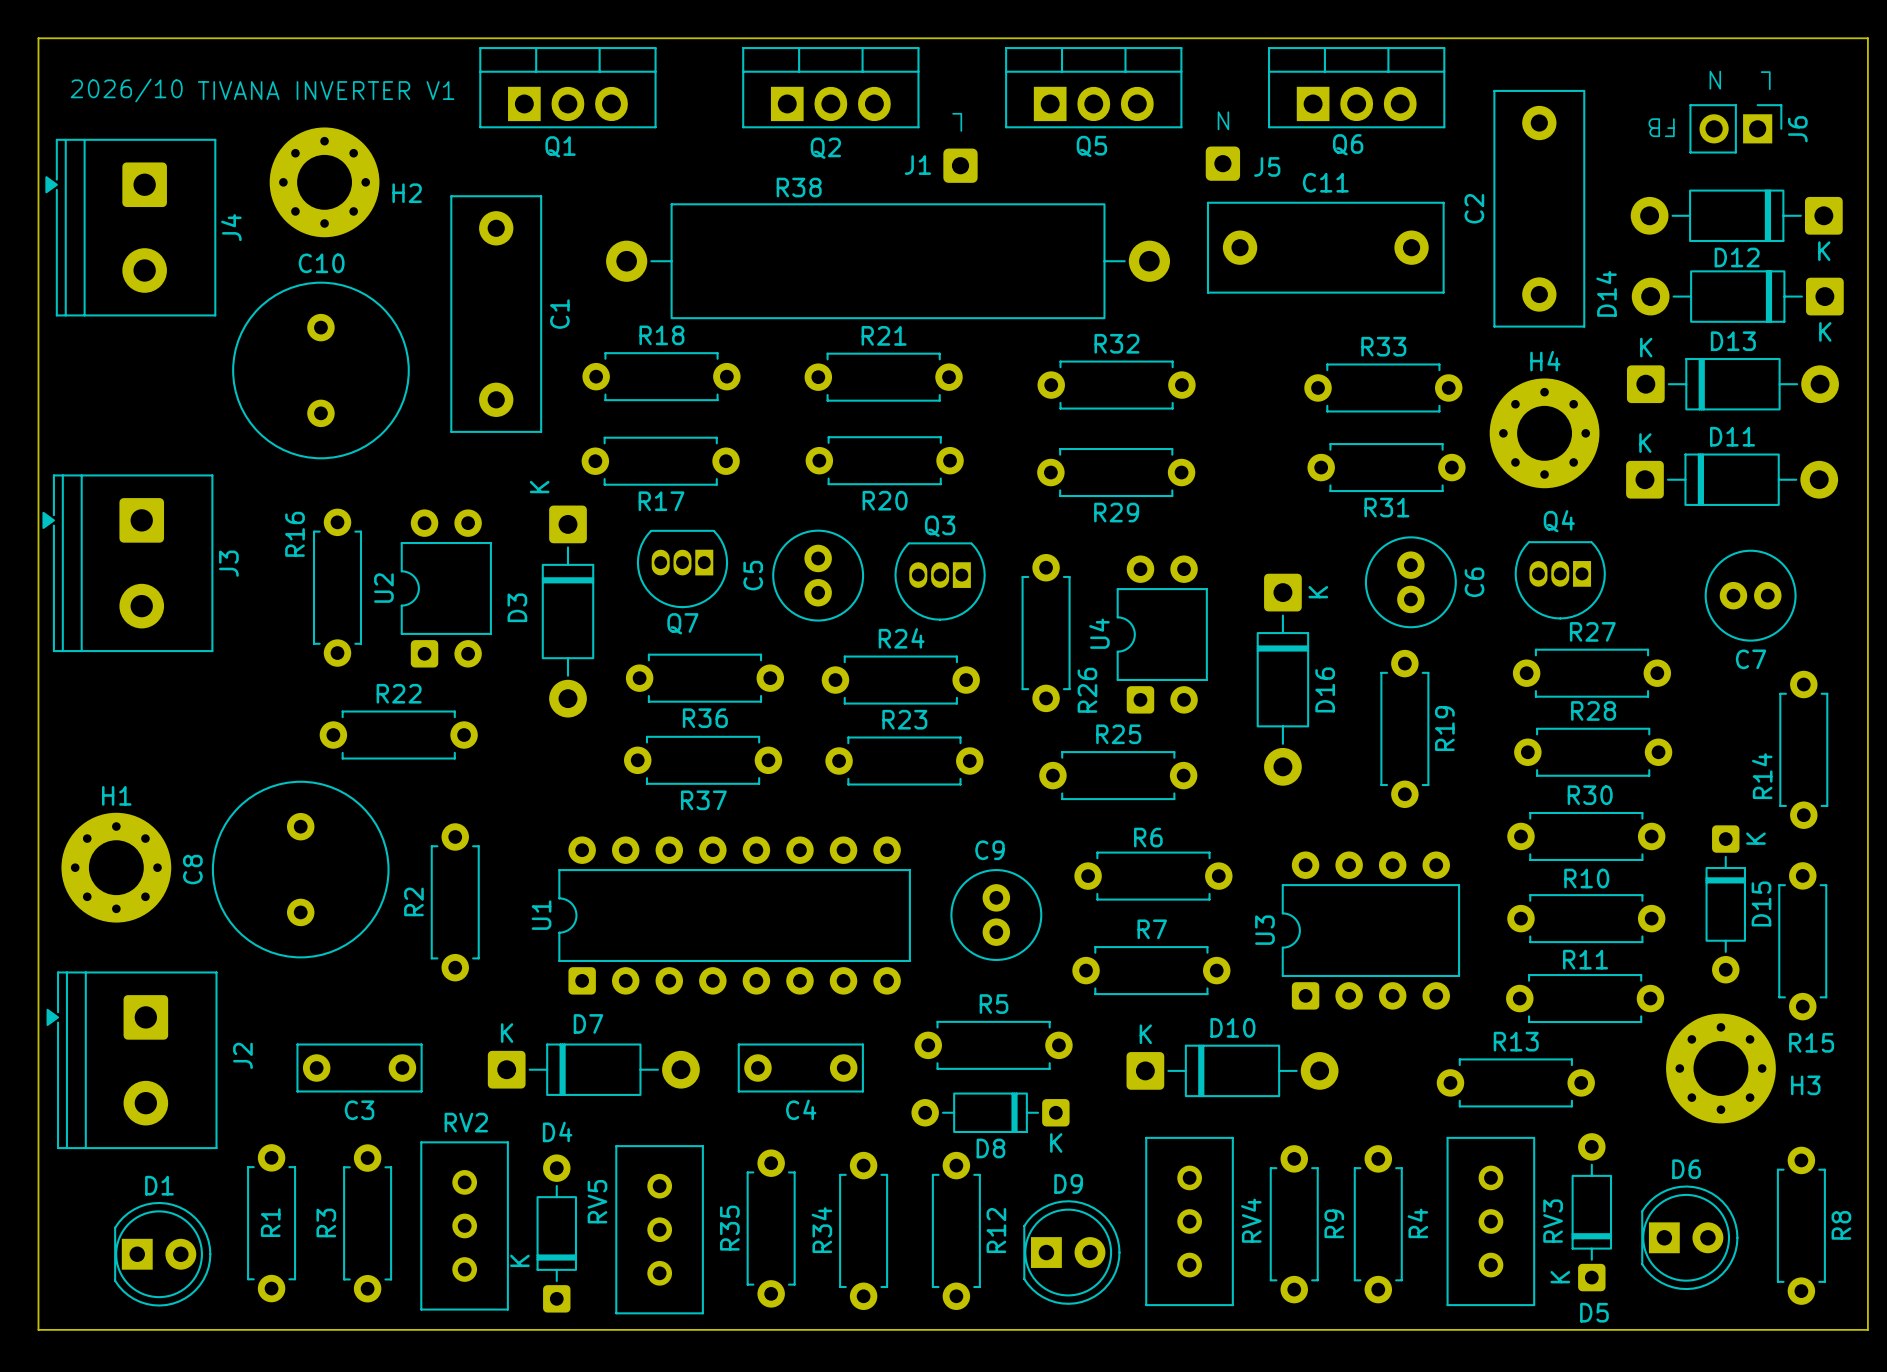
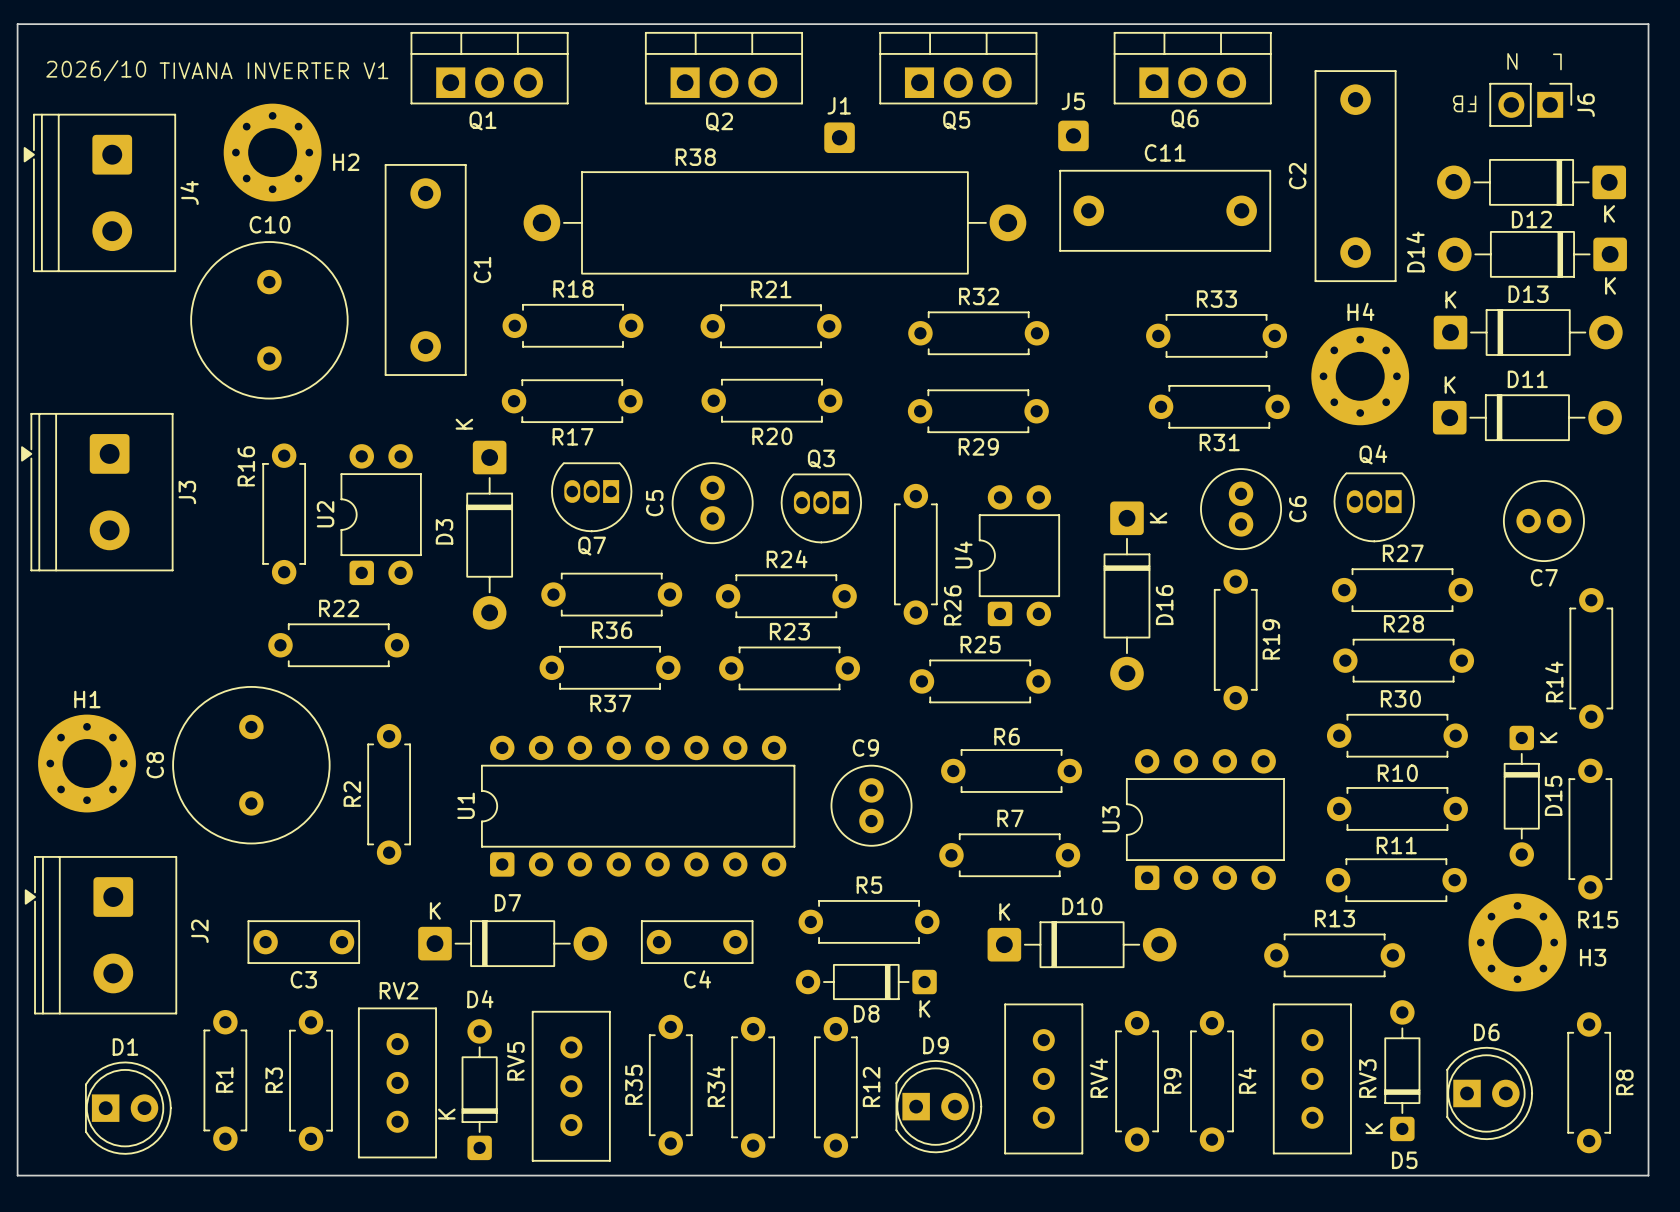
text: N (1223, 120) -> none
text: L (957, 122) -> none
J1 name position: J1 (917, 165) -> J1 (839, 105)
J5 name position: J5 (1267, 166) -> J5 (1073, 101)

